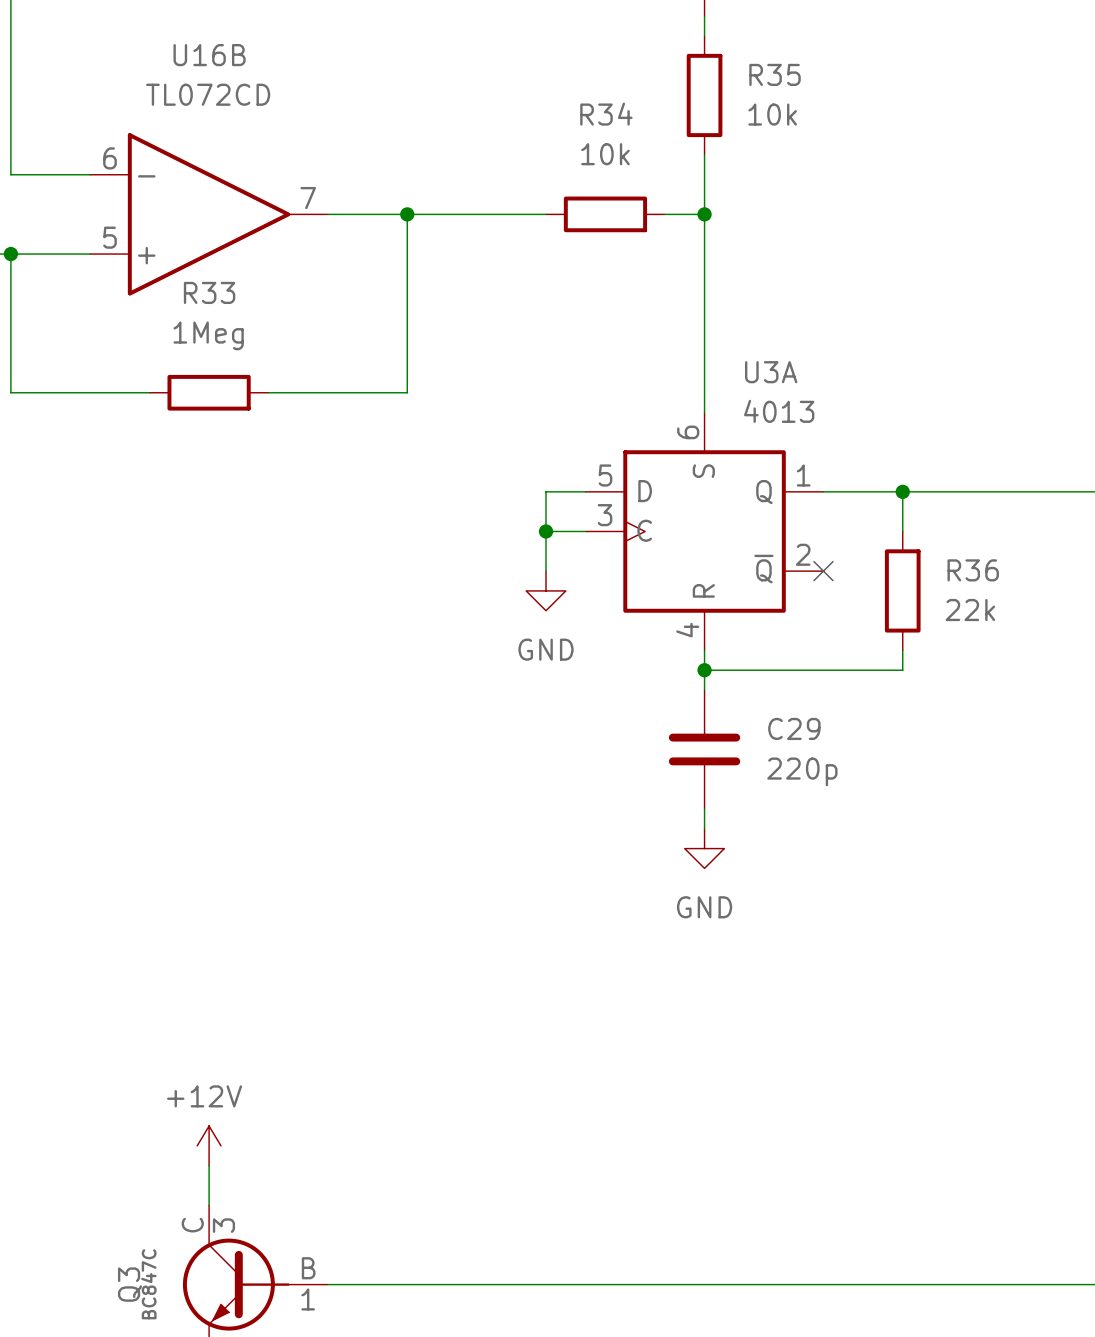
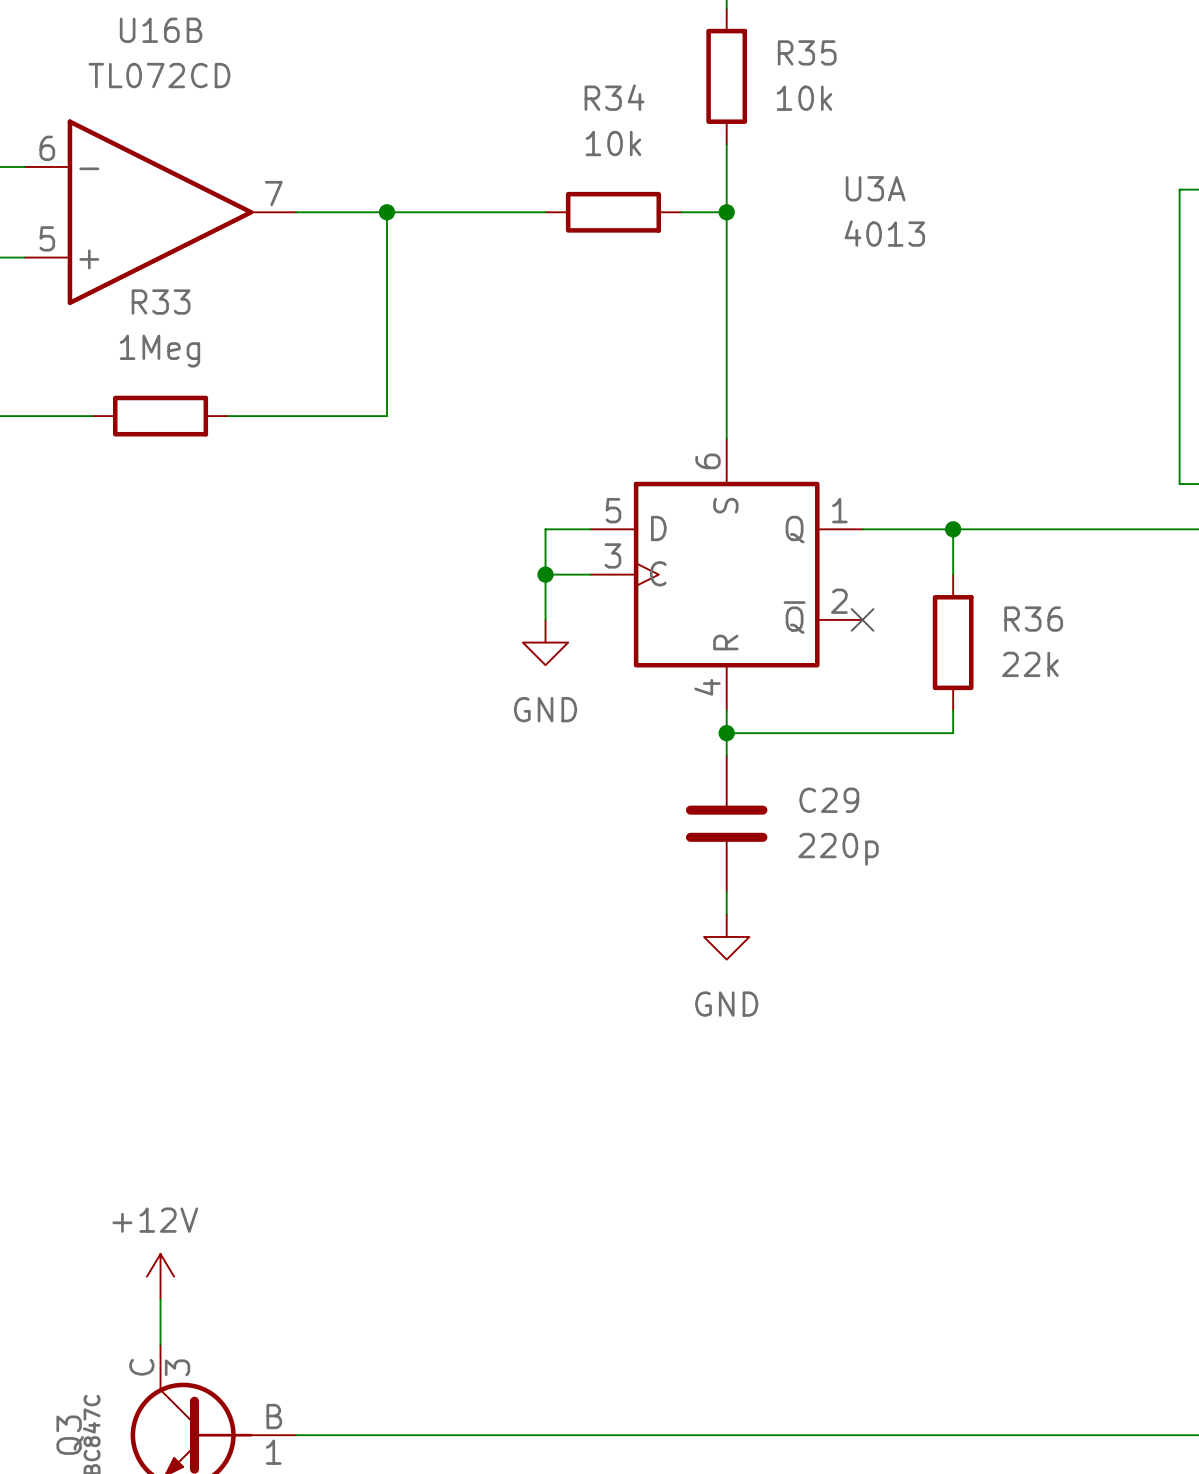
U3A name position: U3A (771, 372) -> U3A (875, 188)
U3A value position: 4013 (779, 411) -> 4013 (884, 233)

